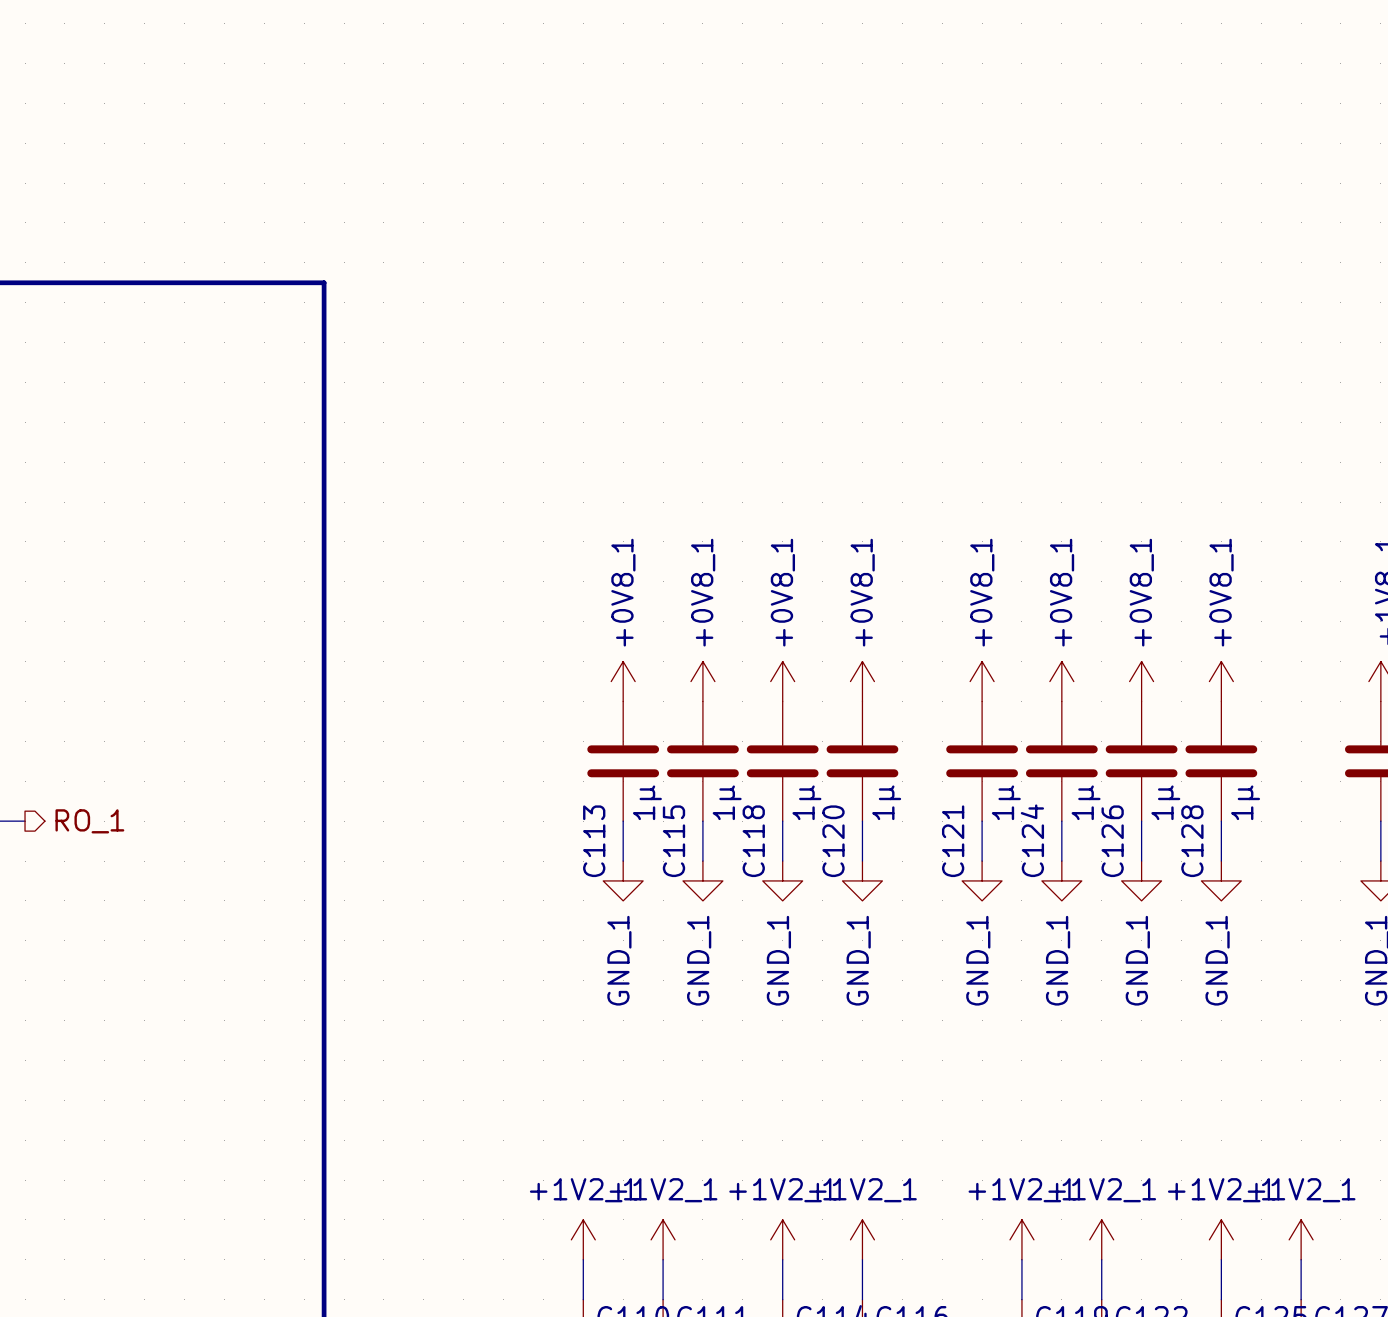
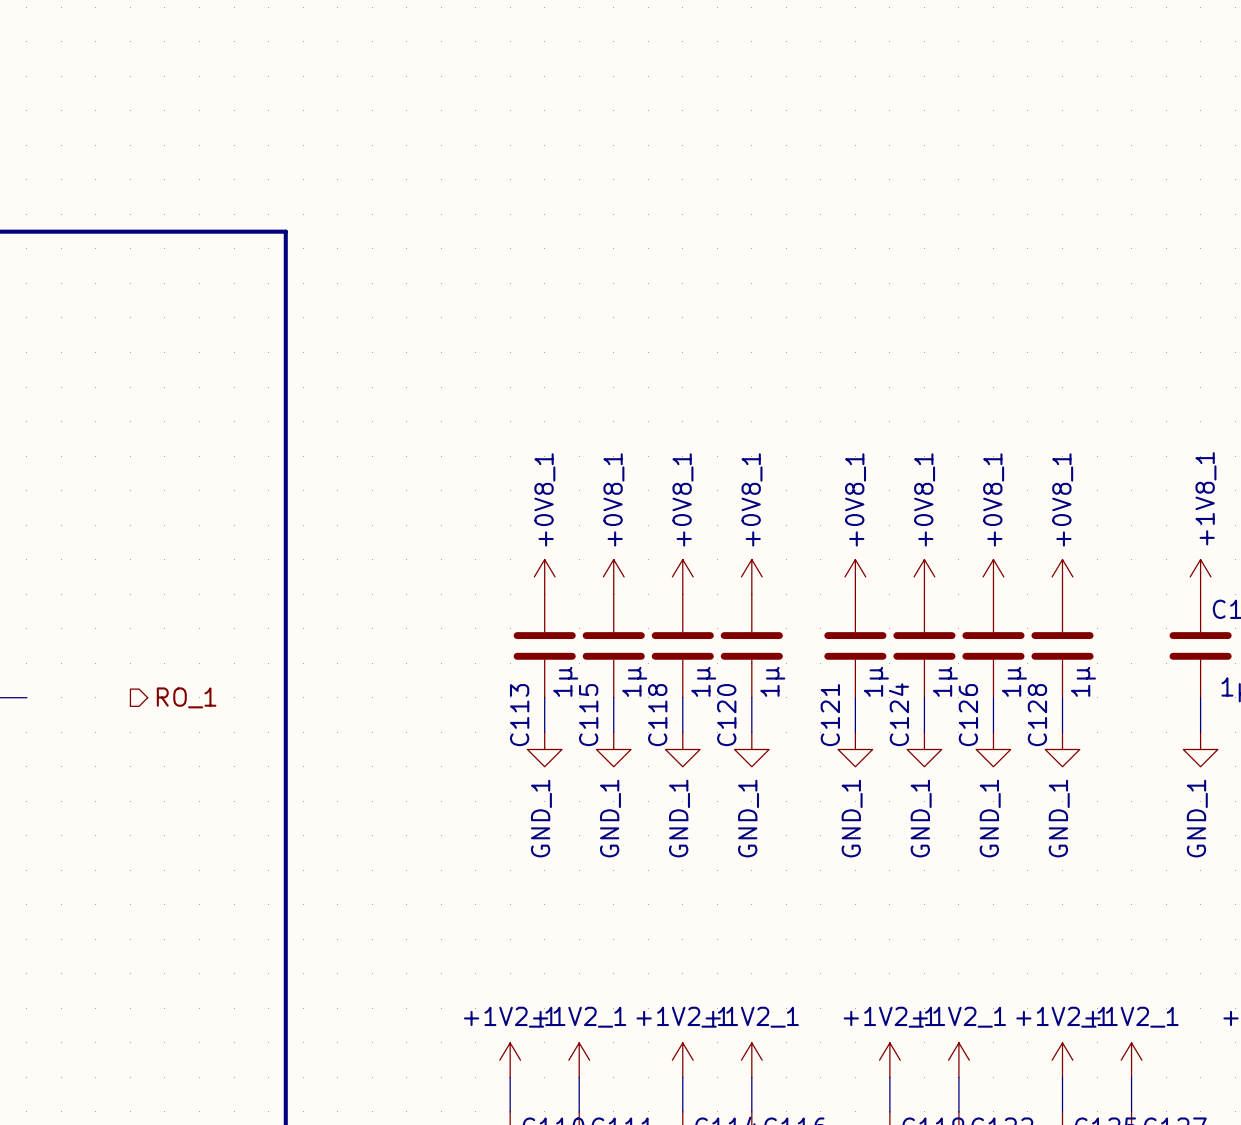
hierarchical label position: RO_1 (89, 821) -> RO_1 (186, 697)

